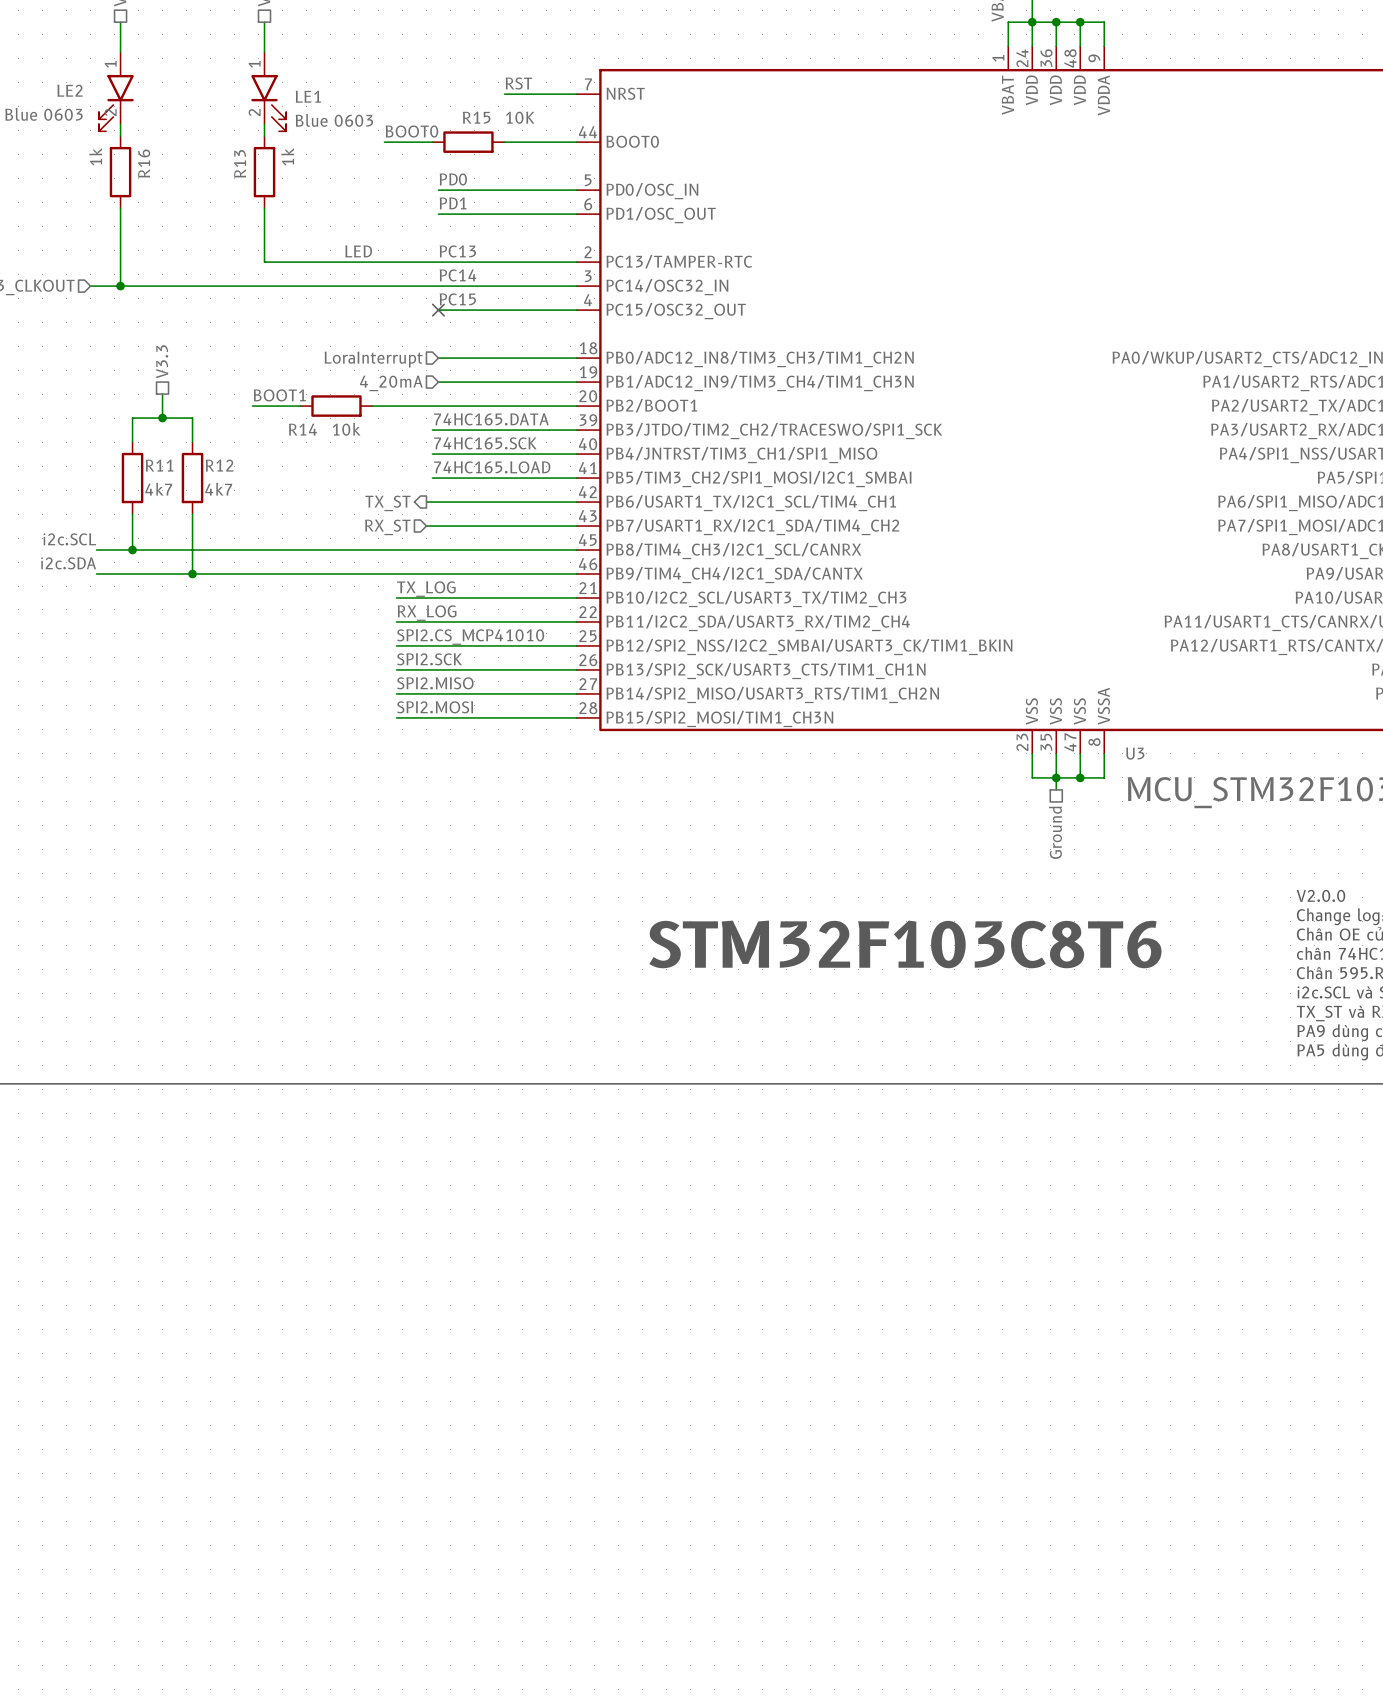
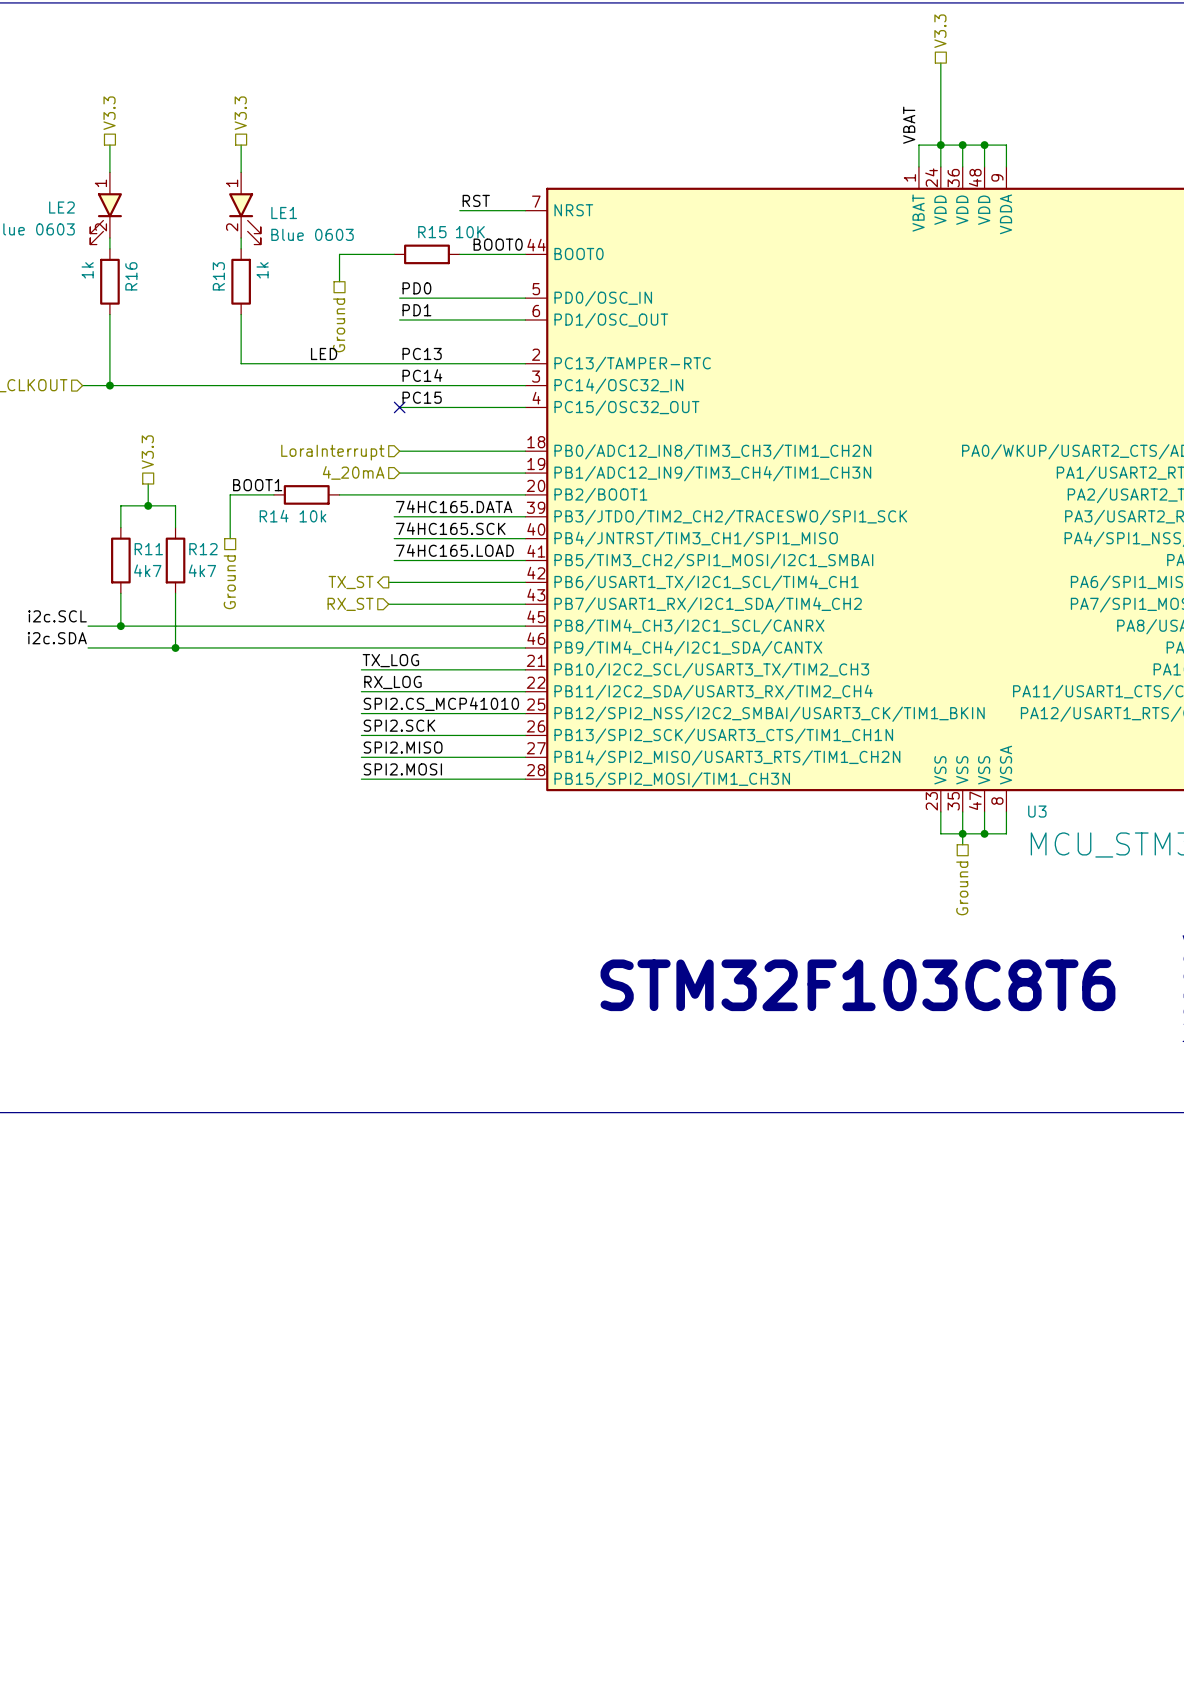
label position: BOOT0 (411, 131) -> BOOT0 (498, 244)
wire: none -> (350, 254) (339, 254) (339, 281)
hierarchical label: none -> Ground (339, 325)
wire: none -> (230, 494) (230, 538)
hierarchical label: none -> Ground (229, 582)

